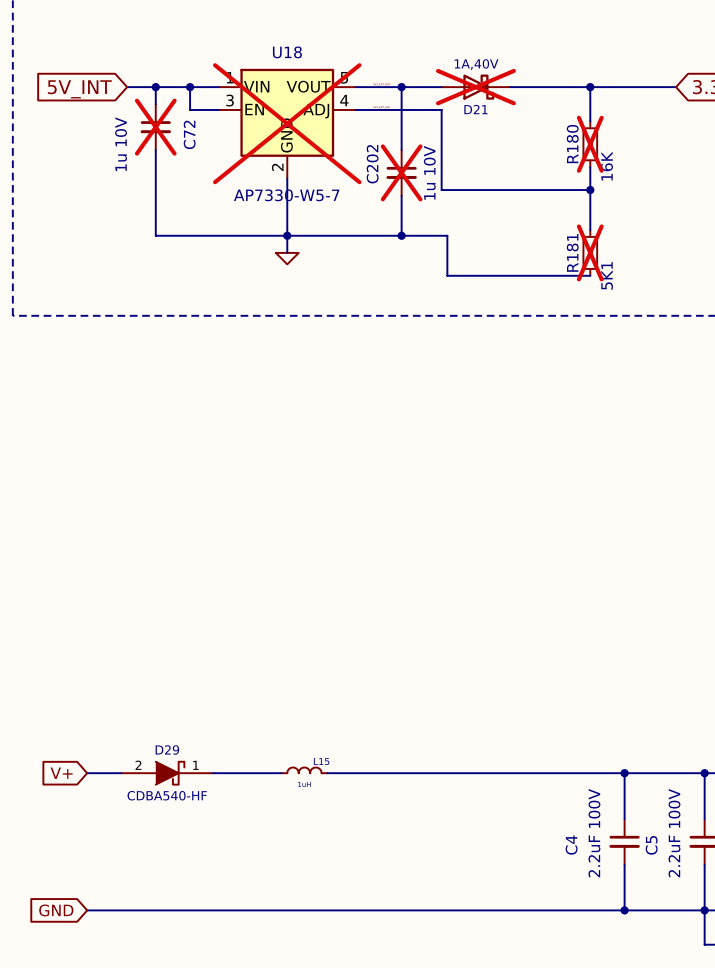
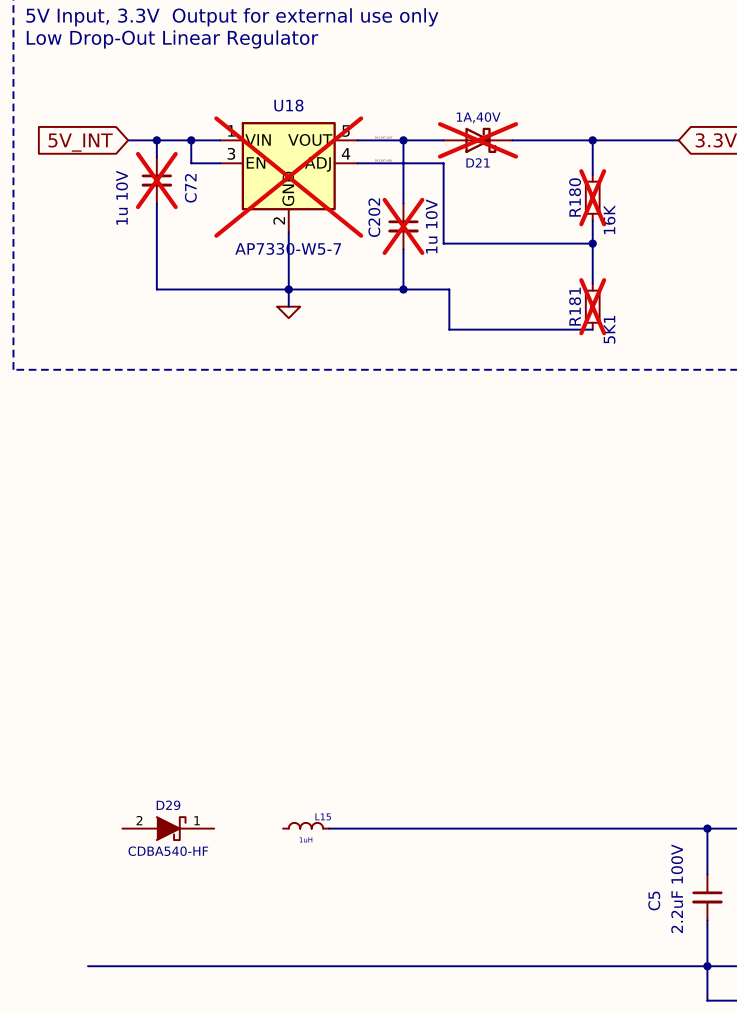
global label: V+ (61, 773) -> none
wire: (87, 773) (121, 773) -> none
wire: (212, 773) (281, 773) -> none
wire: (624, 773) (624, 818) -> none
junction: (624, 773) -> none
C4: 2.2uF 100V (624, 841) -> none
wire: (624, 864) (624, 910) -> none
global label: GND (56, 910) -> none
junction: (624, 910) -> none

